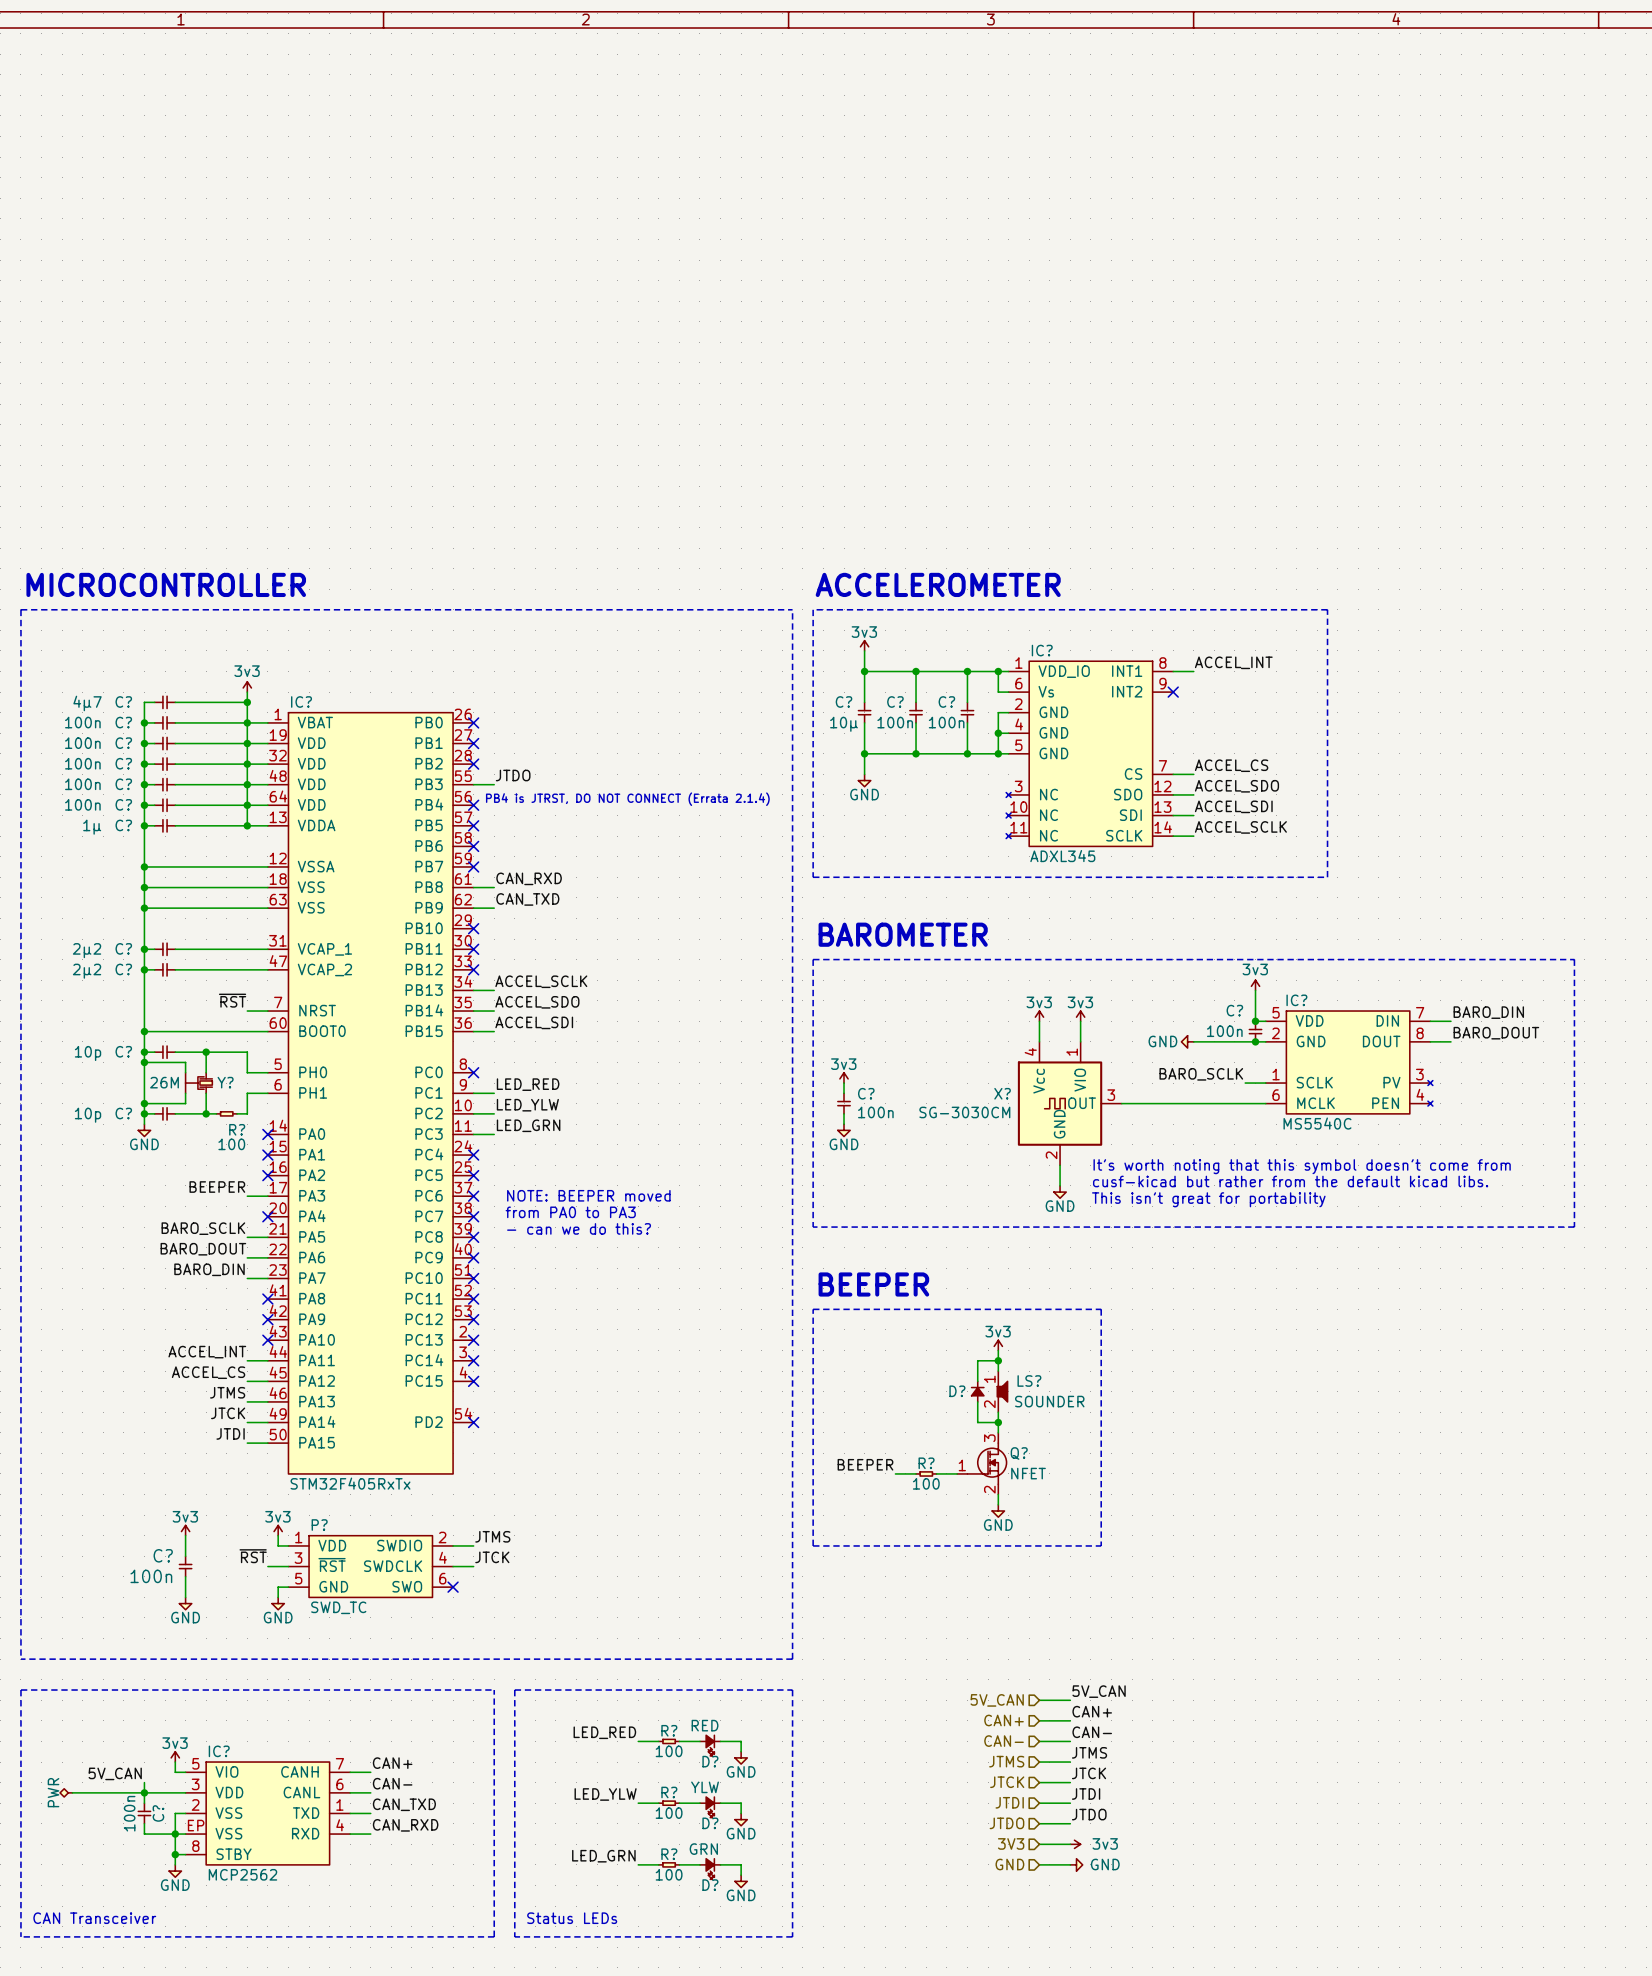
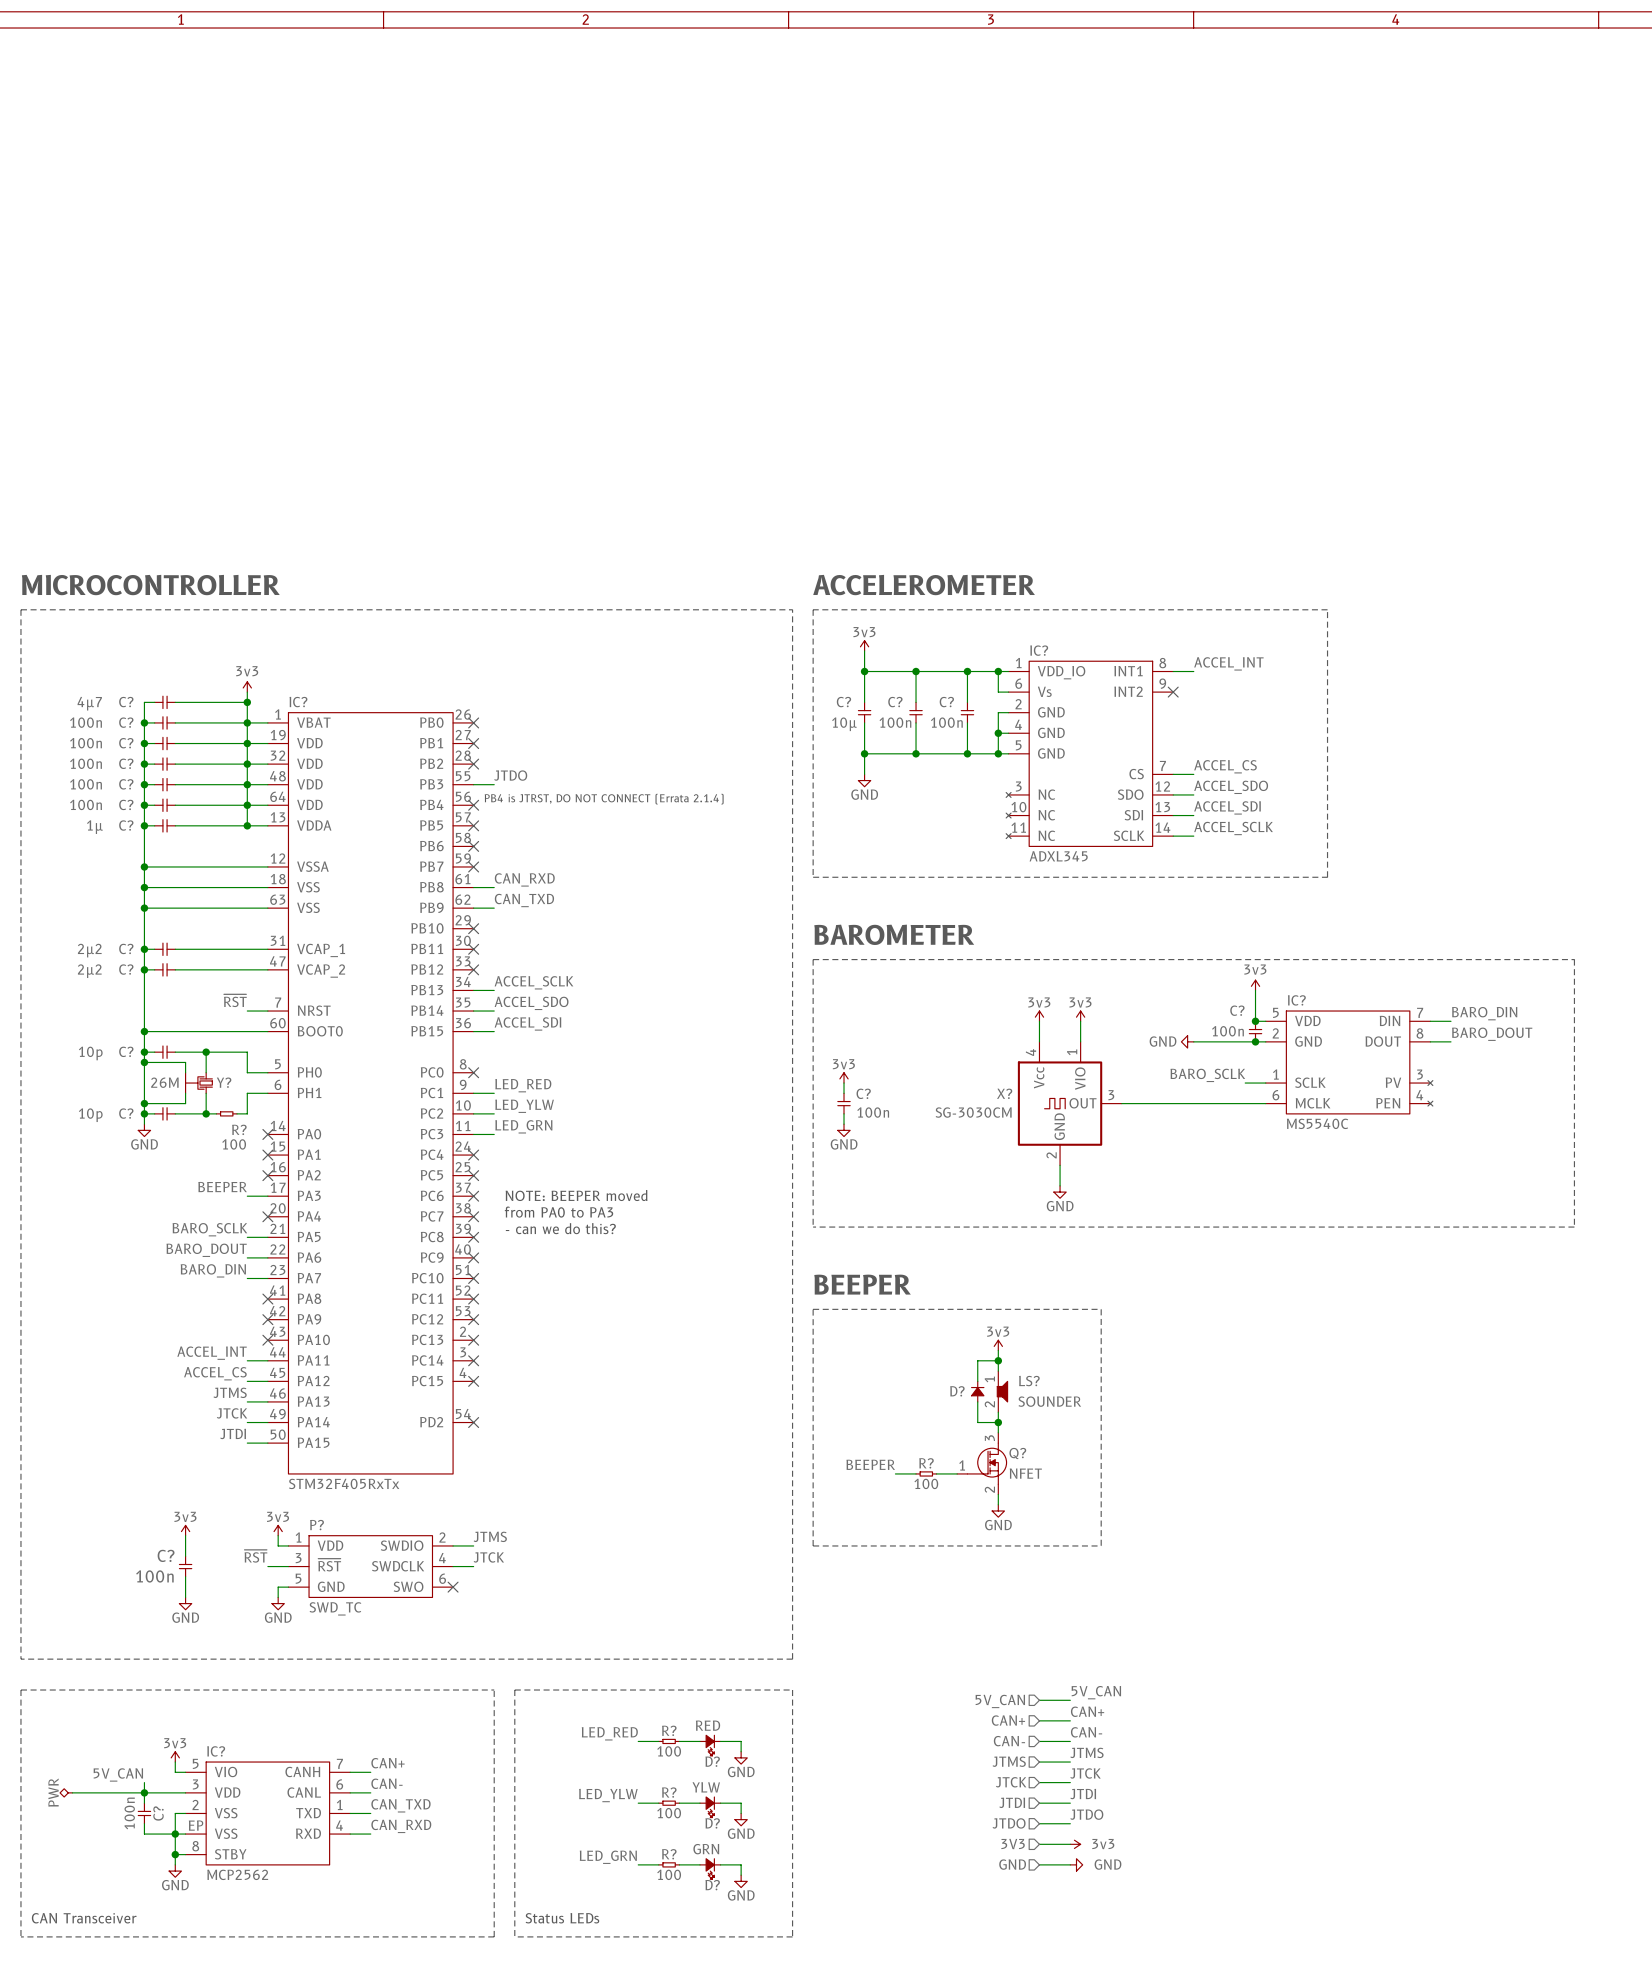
text: It's worth noting that this symbol doesn't come from (1302, 1166) -> none
text: cusf-kicad but rather from the default kicad libs. (1290, 1181) -> none
text: This isn't great for portability (1208, 1199) -> none

